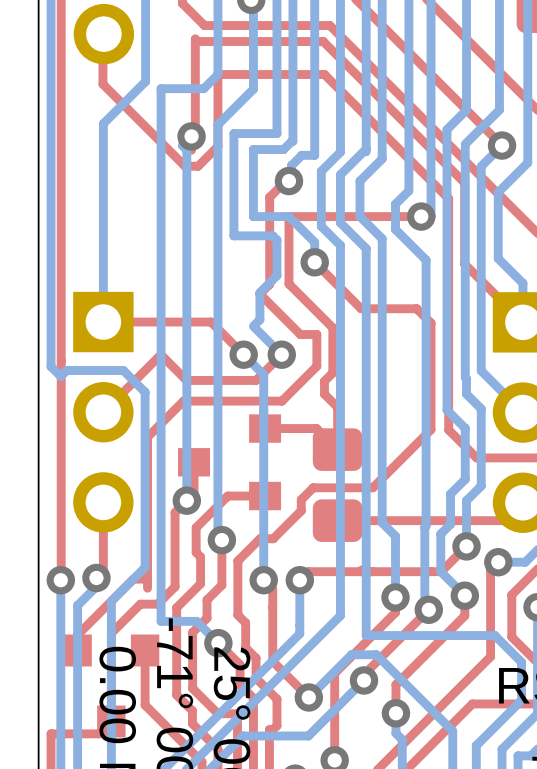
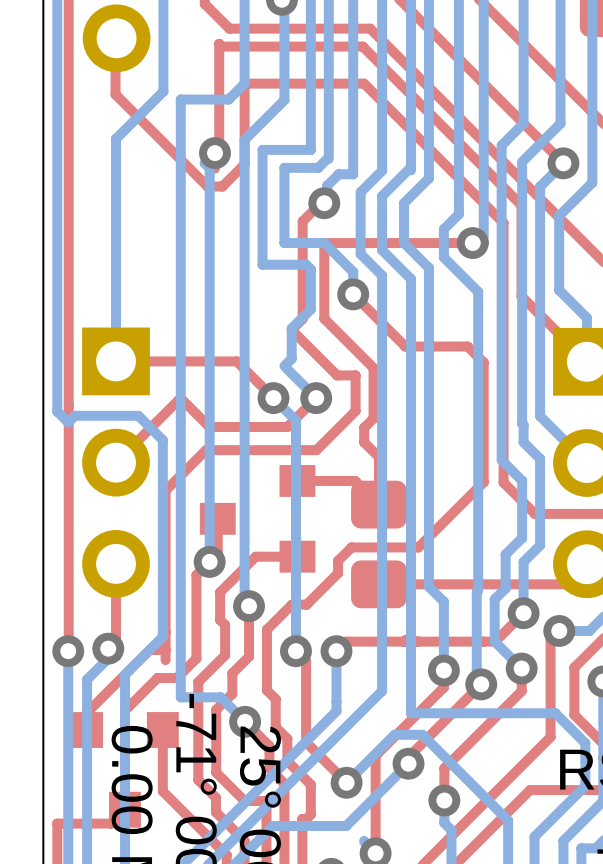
bottom track: none -> (364, 840) (364, 841)

